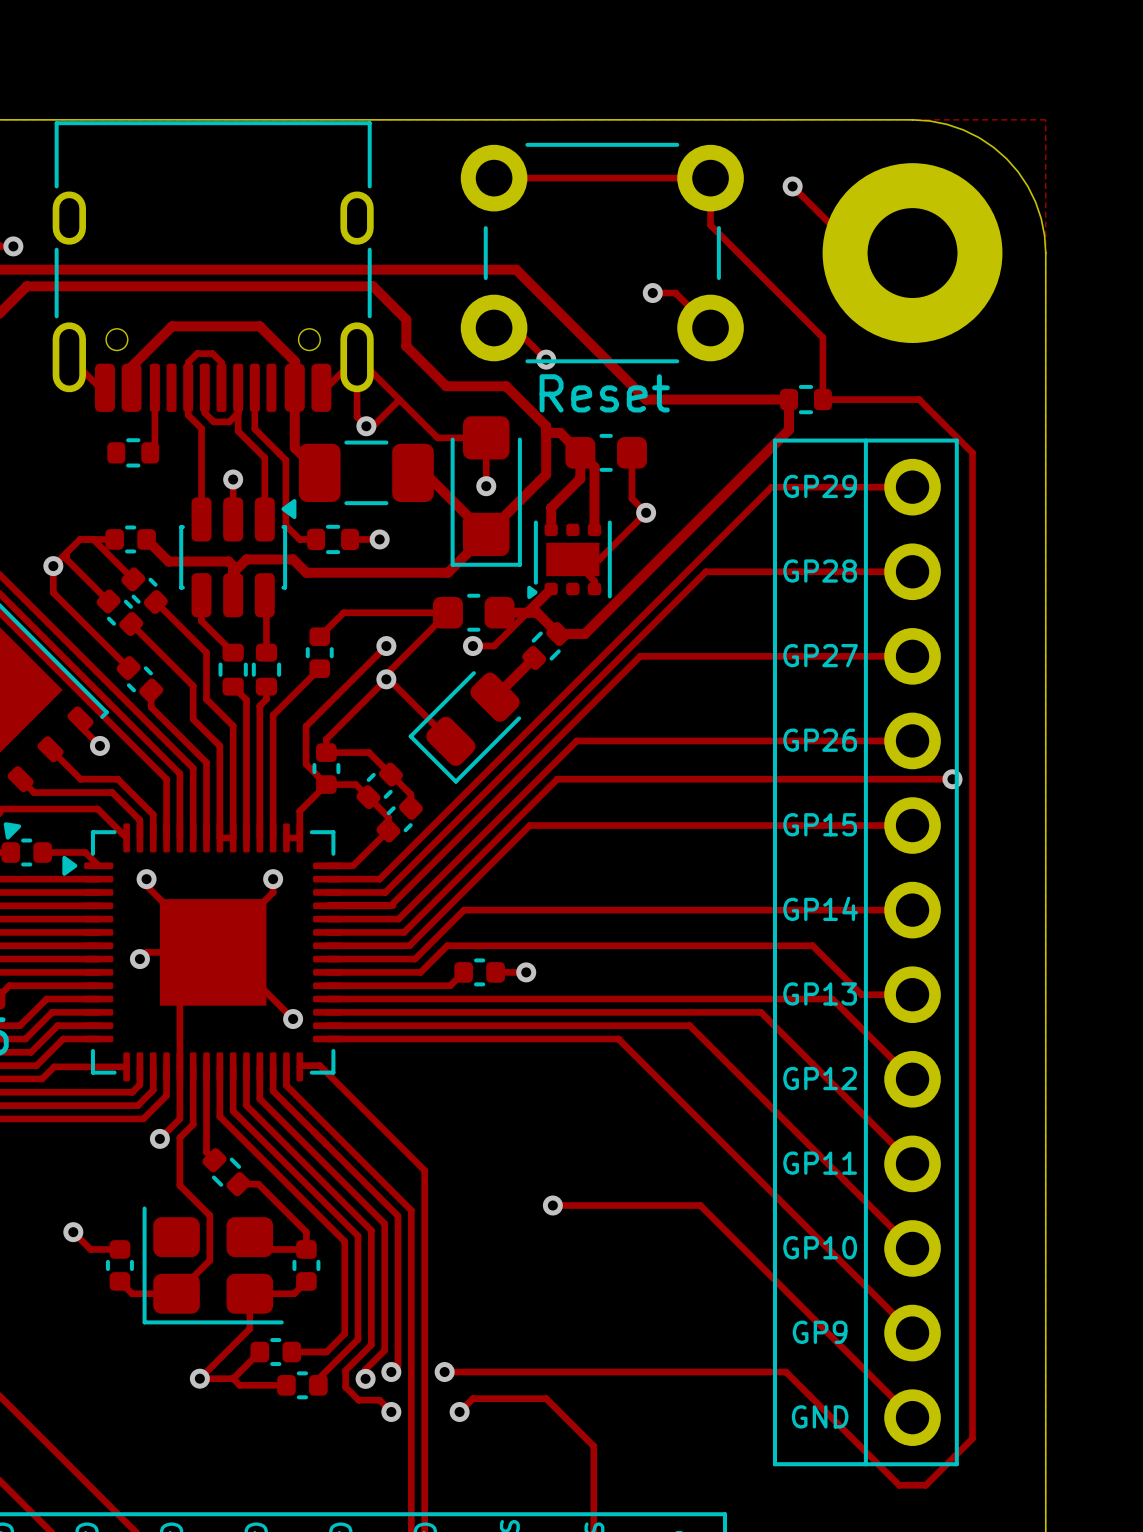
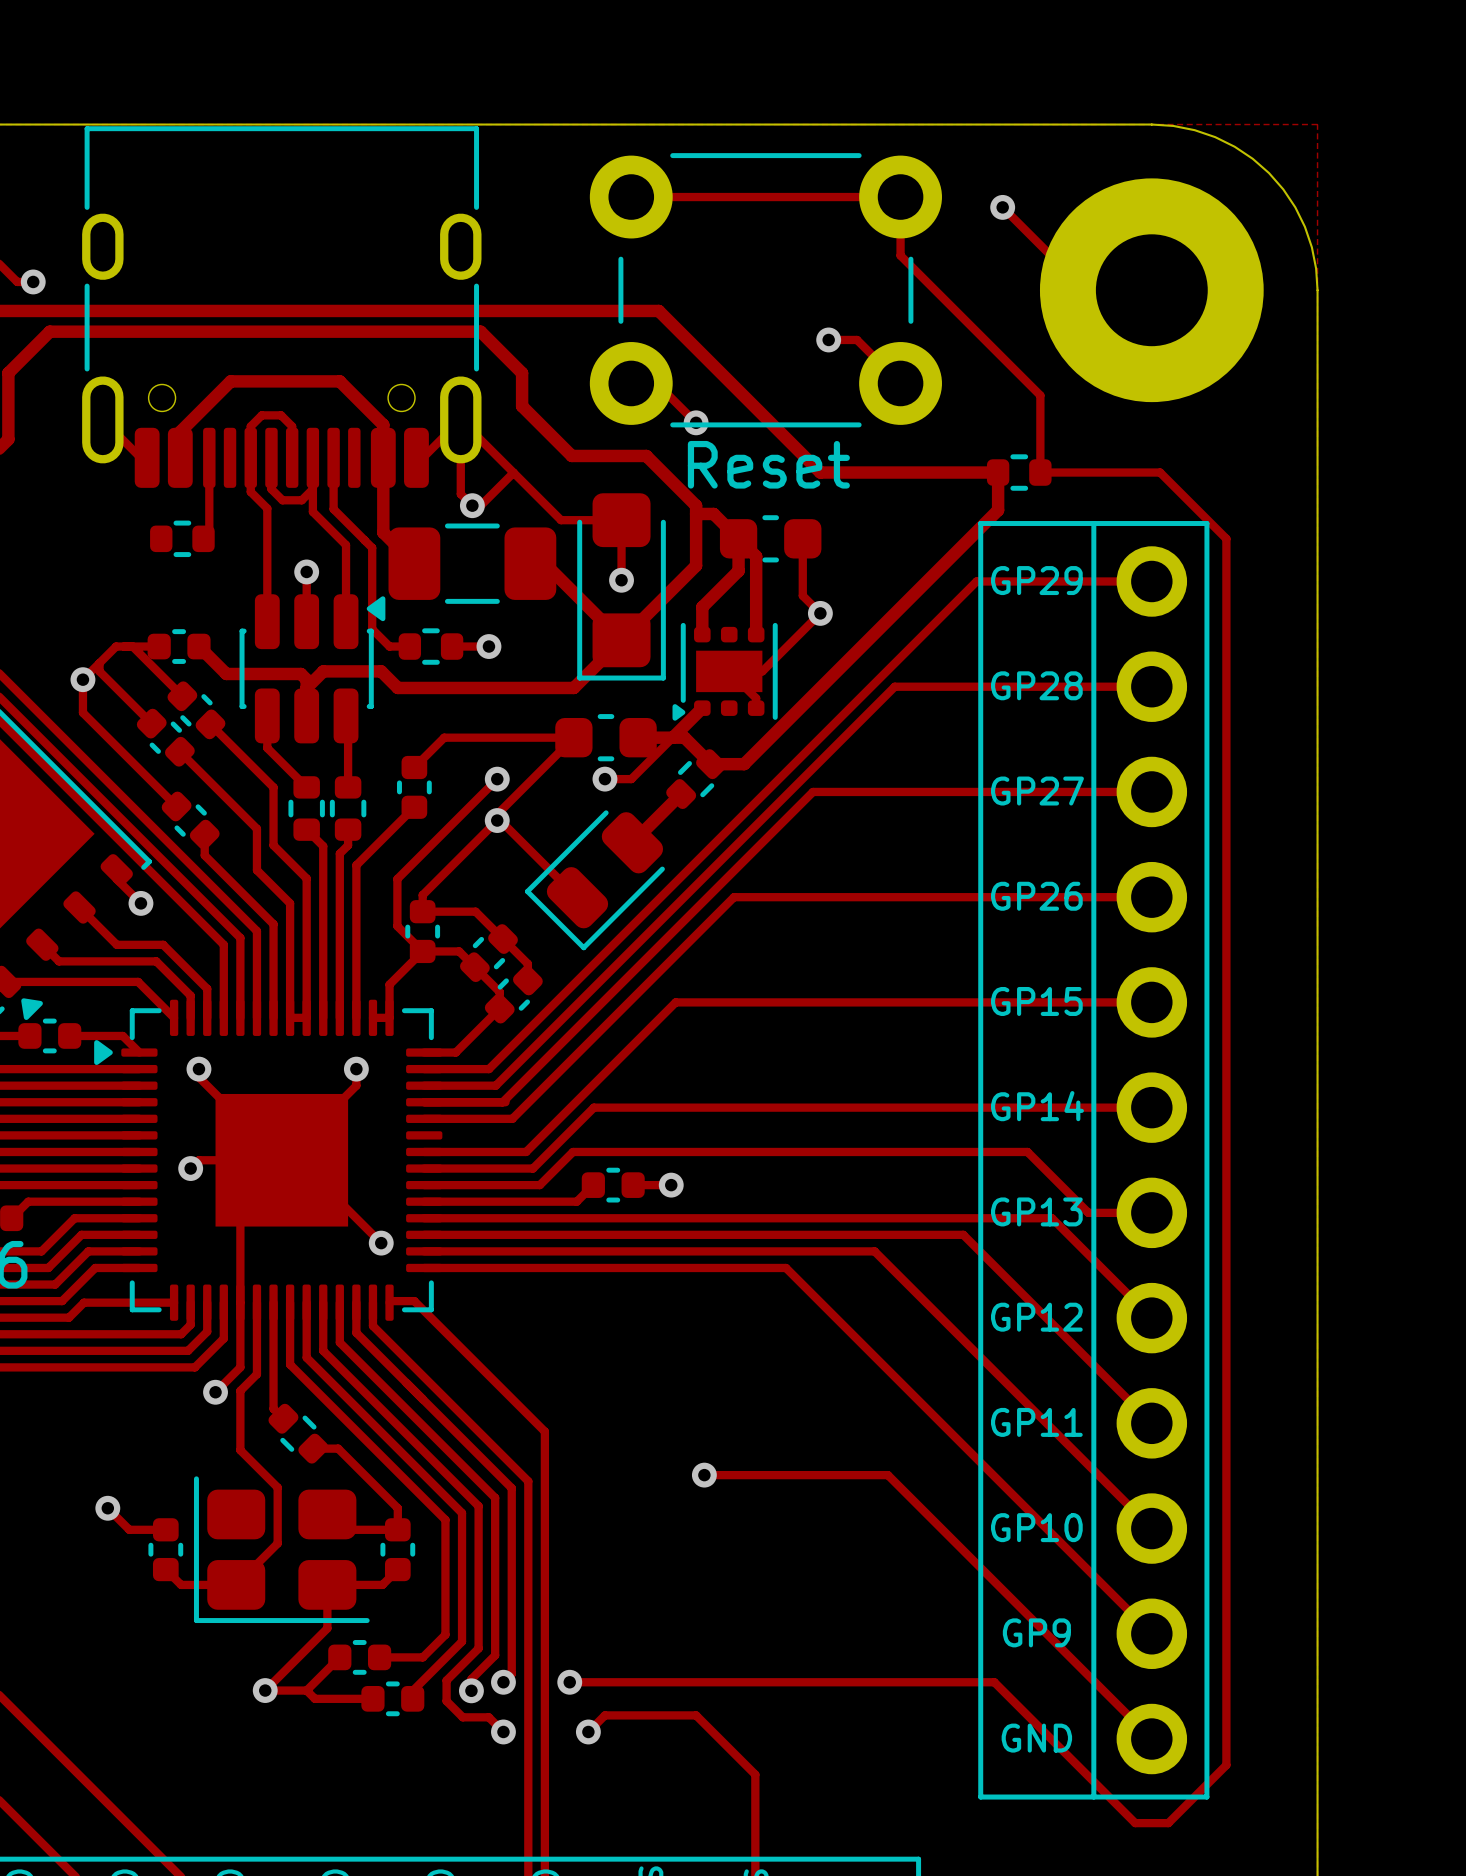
track: (952, 779) (557, 779) (404, 932) (327, 932) -> none
via: (952, 779) -> none

